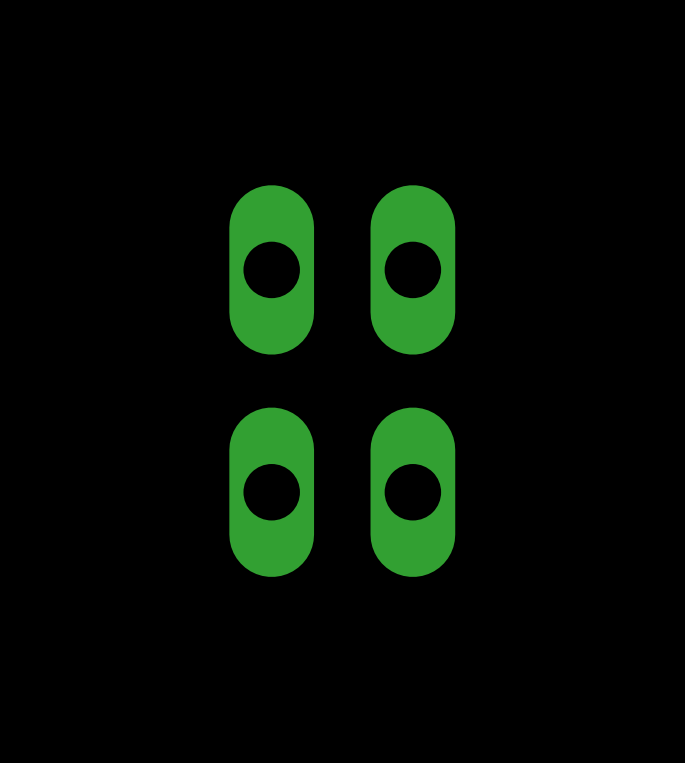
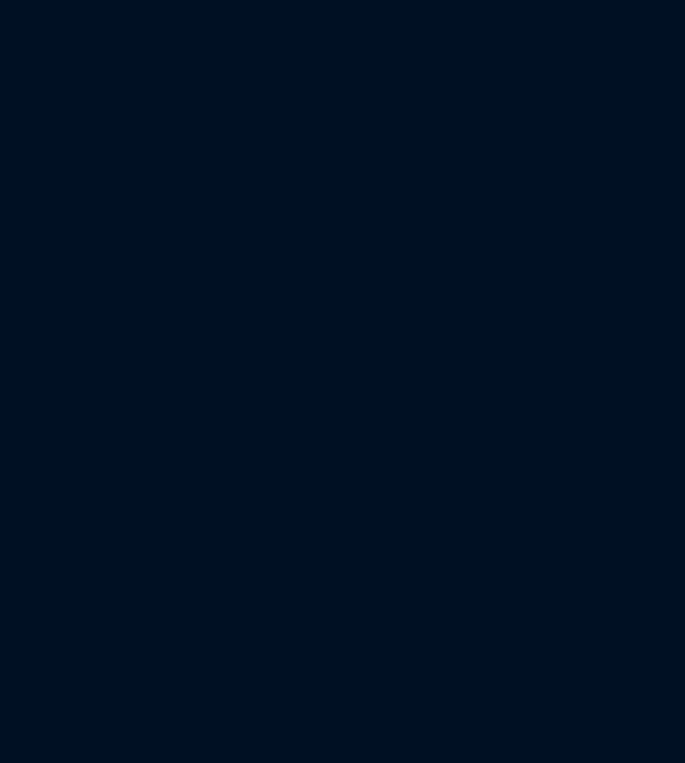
part: (342, 269) -> none
part: (342, 492) -> none

